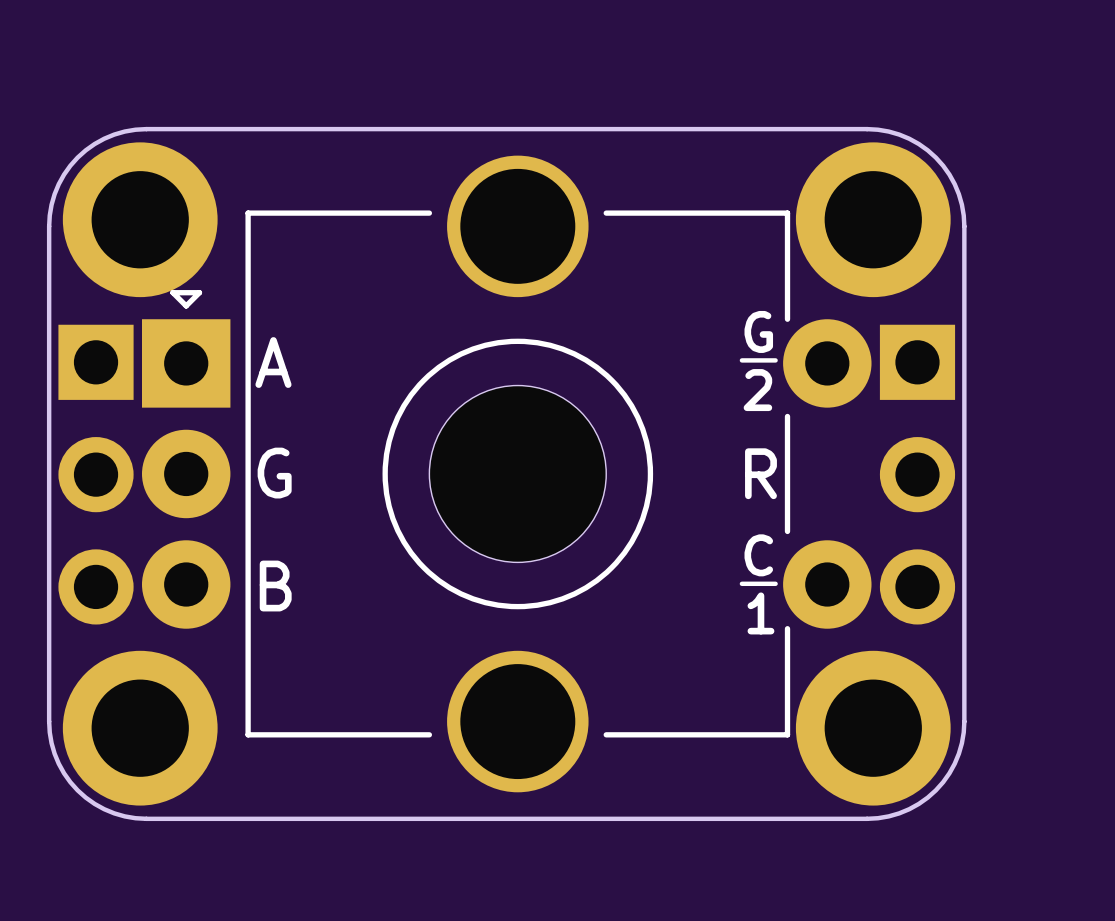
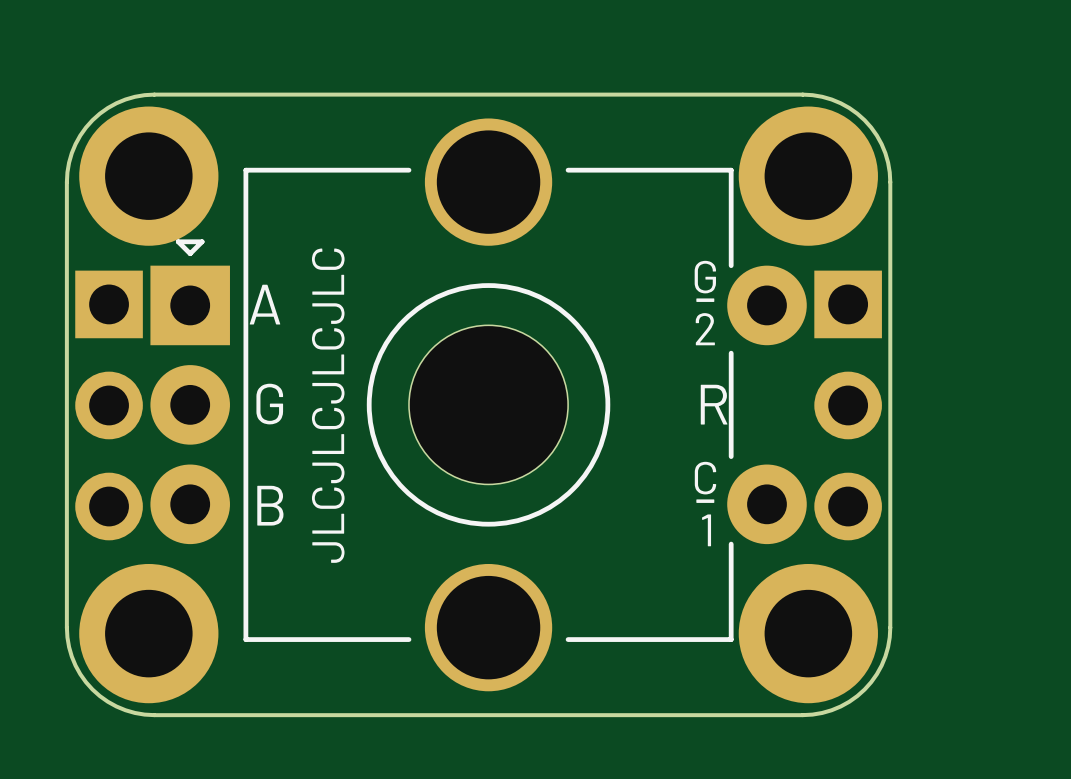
text: none -> JLCJLCJLCJLC (328, 405)

